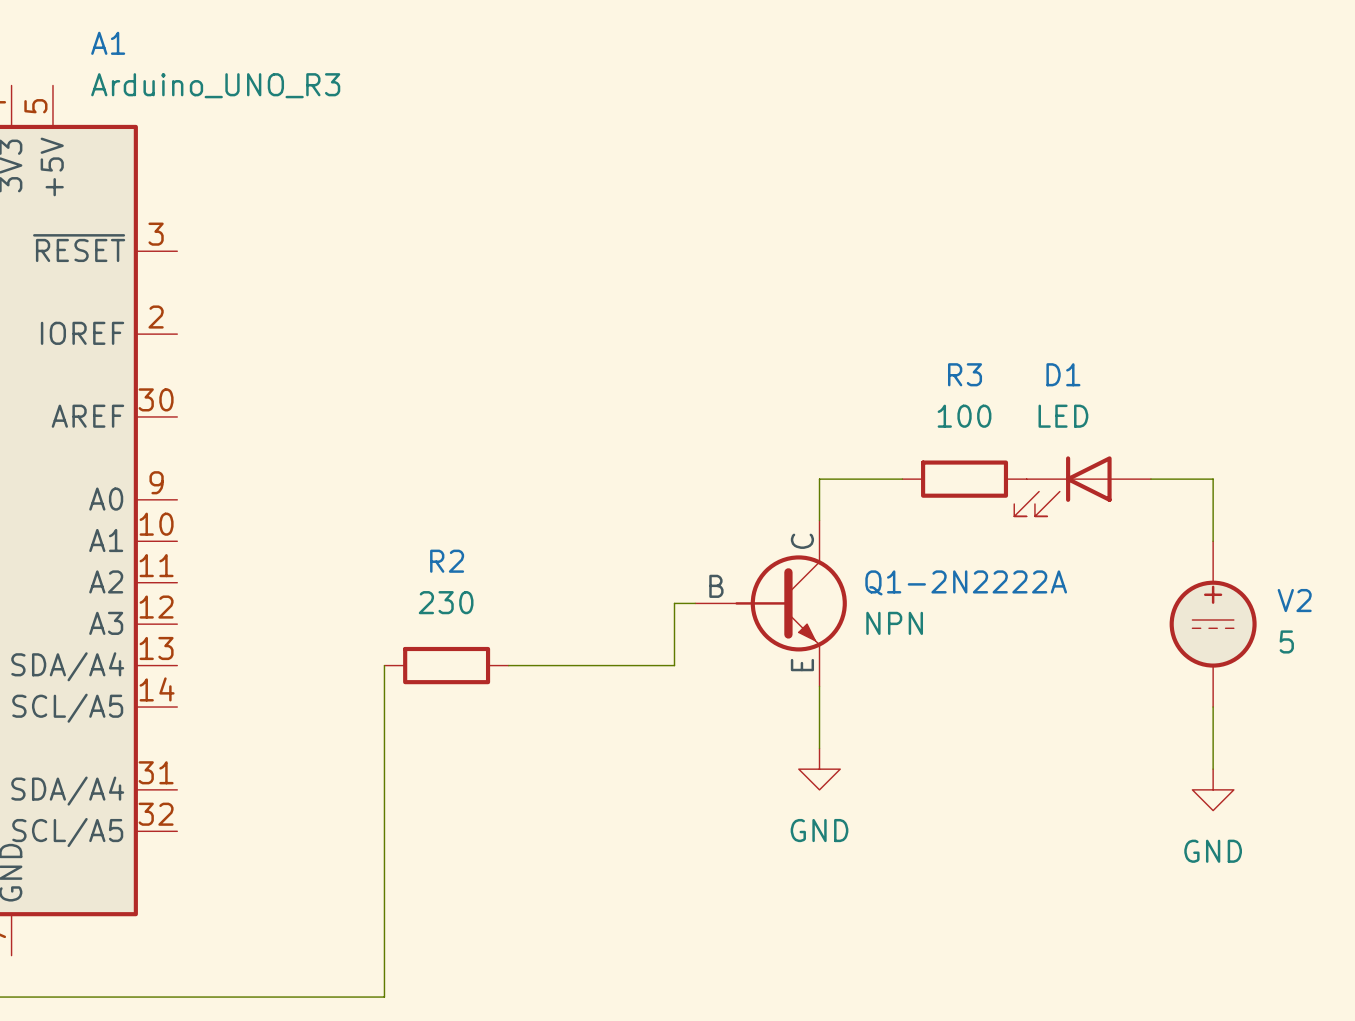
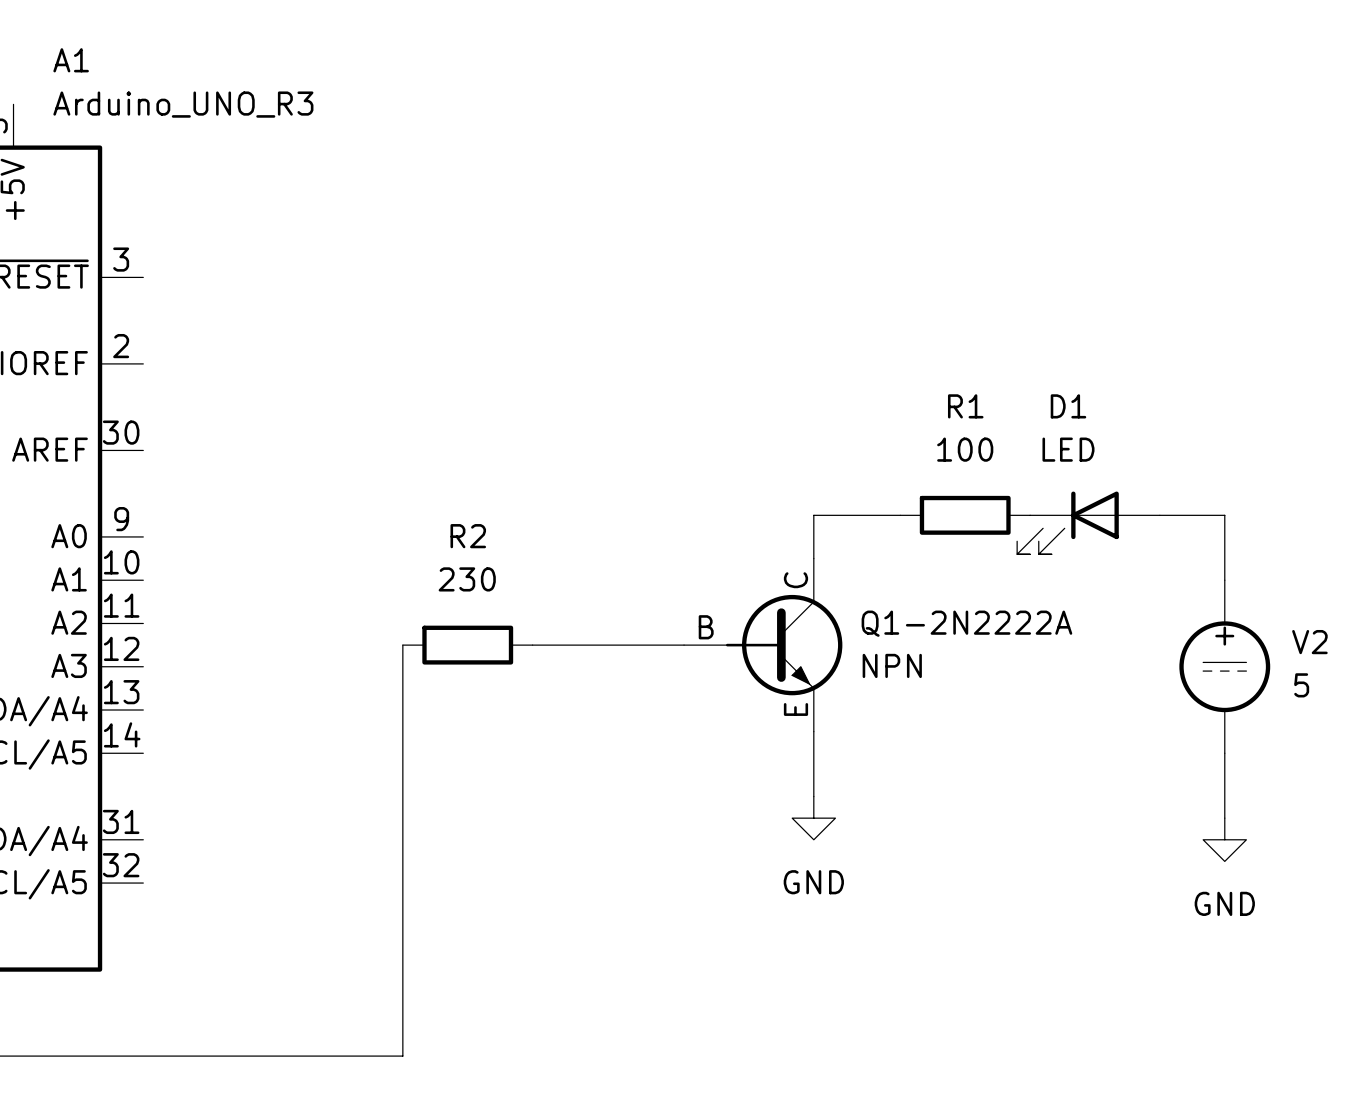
R3 name: R3 (965, 374) -> R1 (965, 406)
wire: (674, 603) (674, 665) (508, 665) -> (662, 645) (532, 645)
wire: (384, 665) (384, 997) -> (402, 645) (402, 1056) (359, 1056)
R2 position: (446, 665) -> (467, 645)

